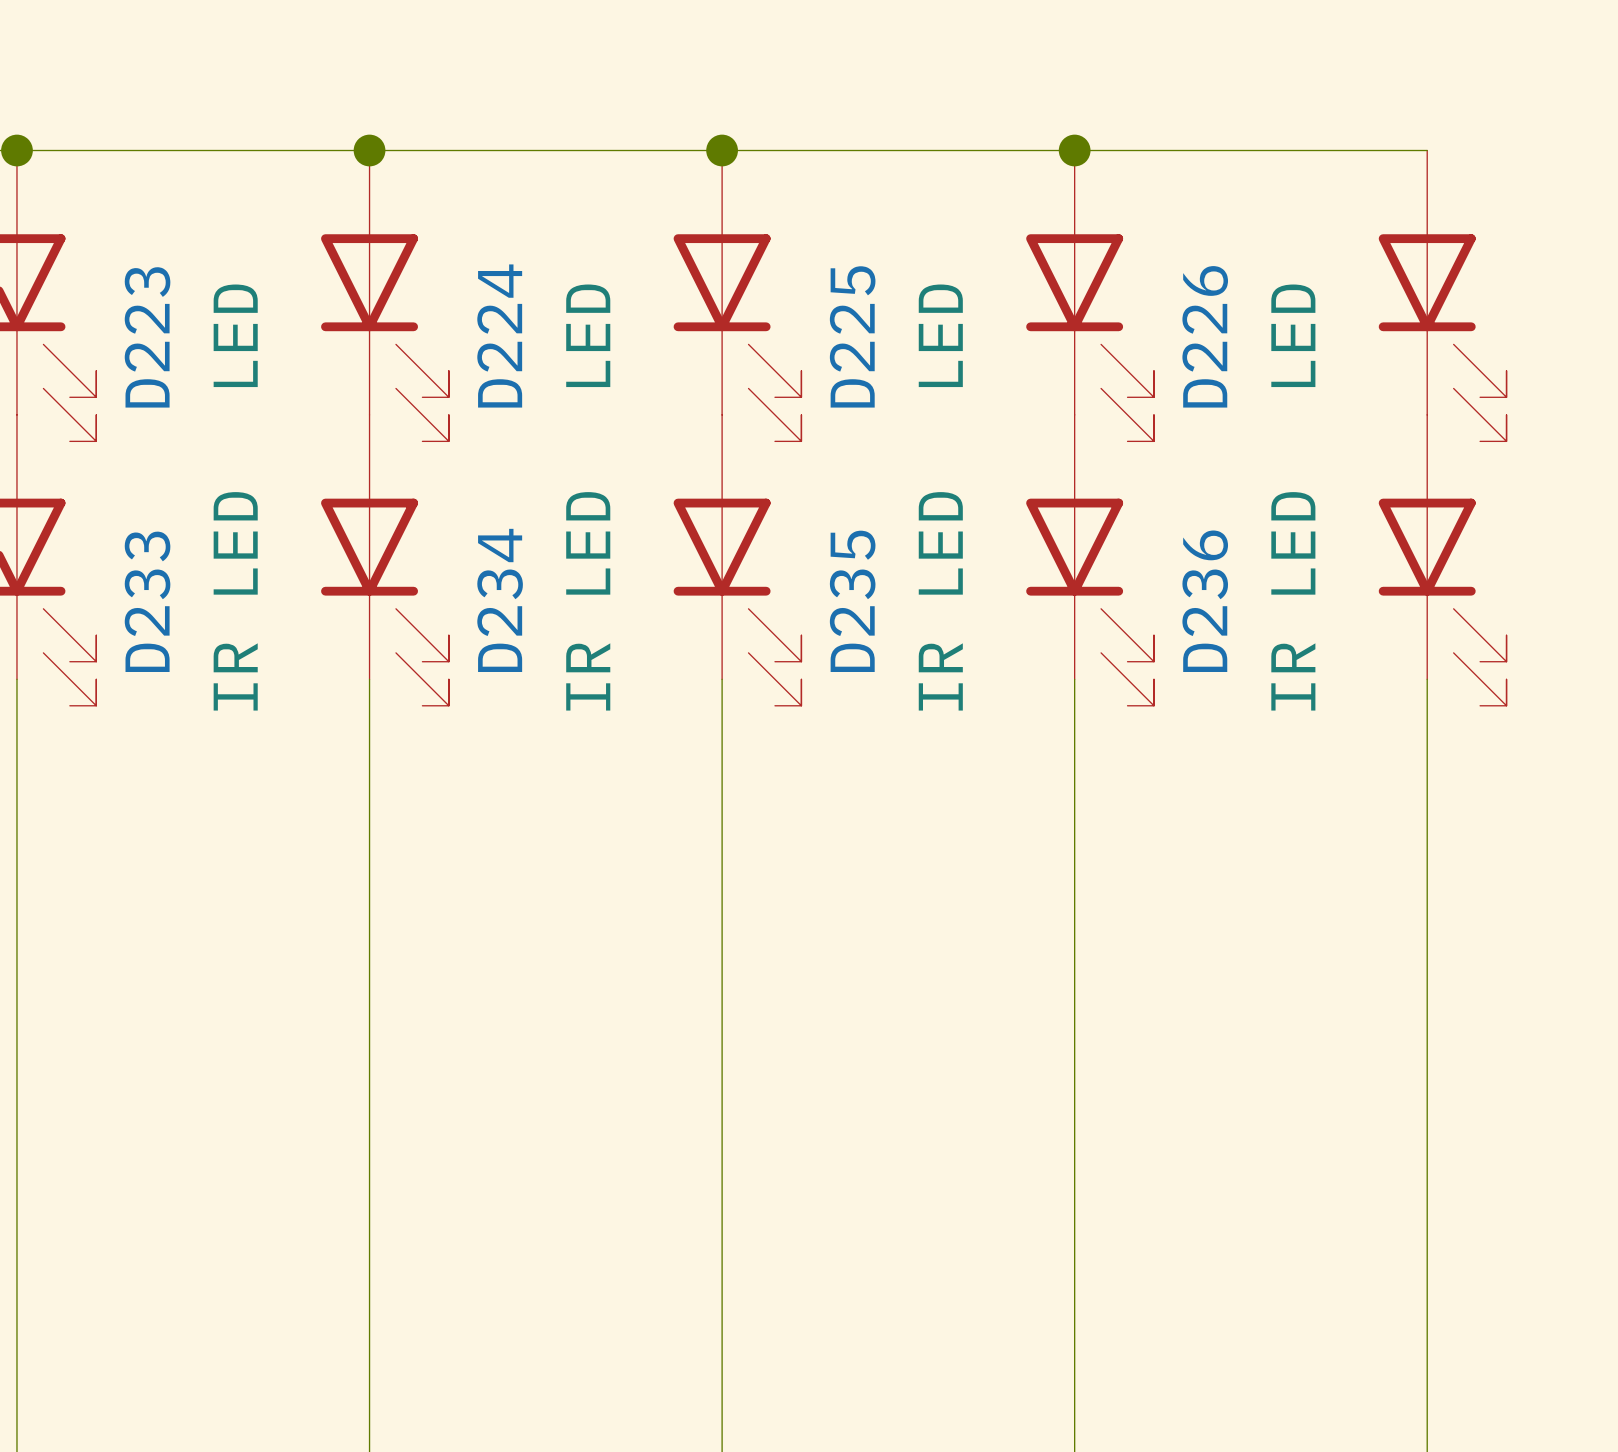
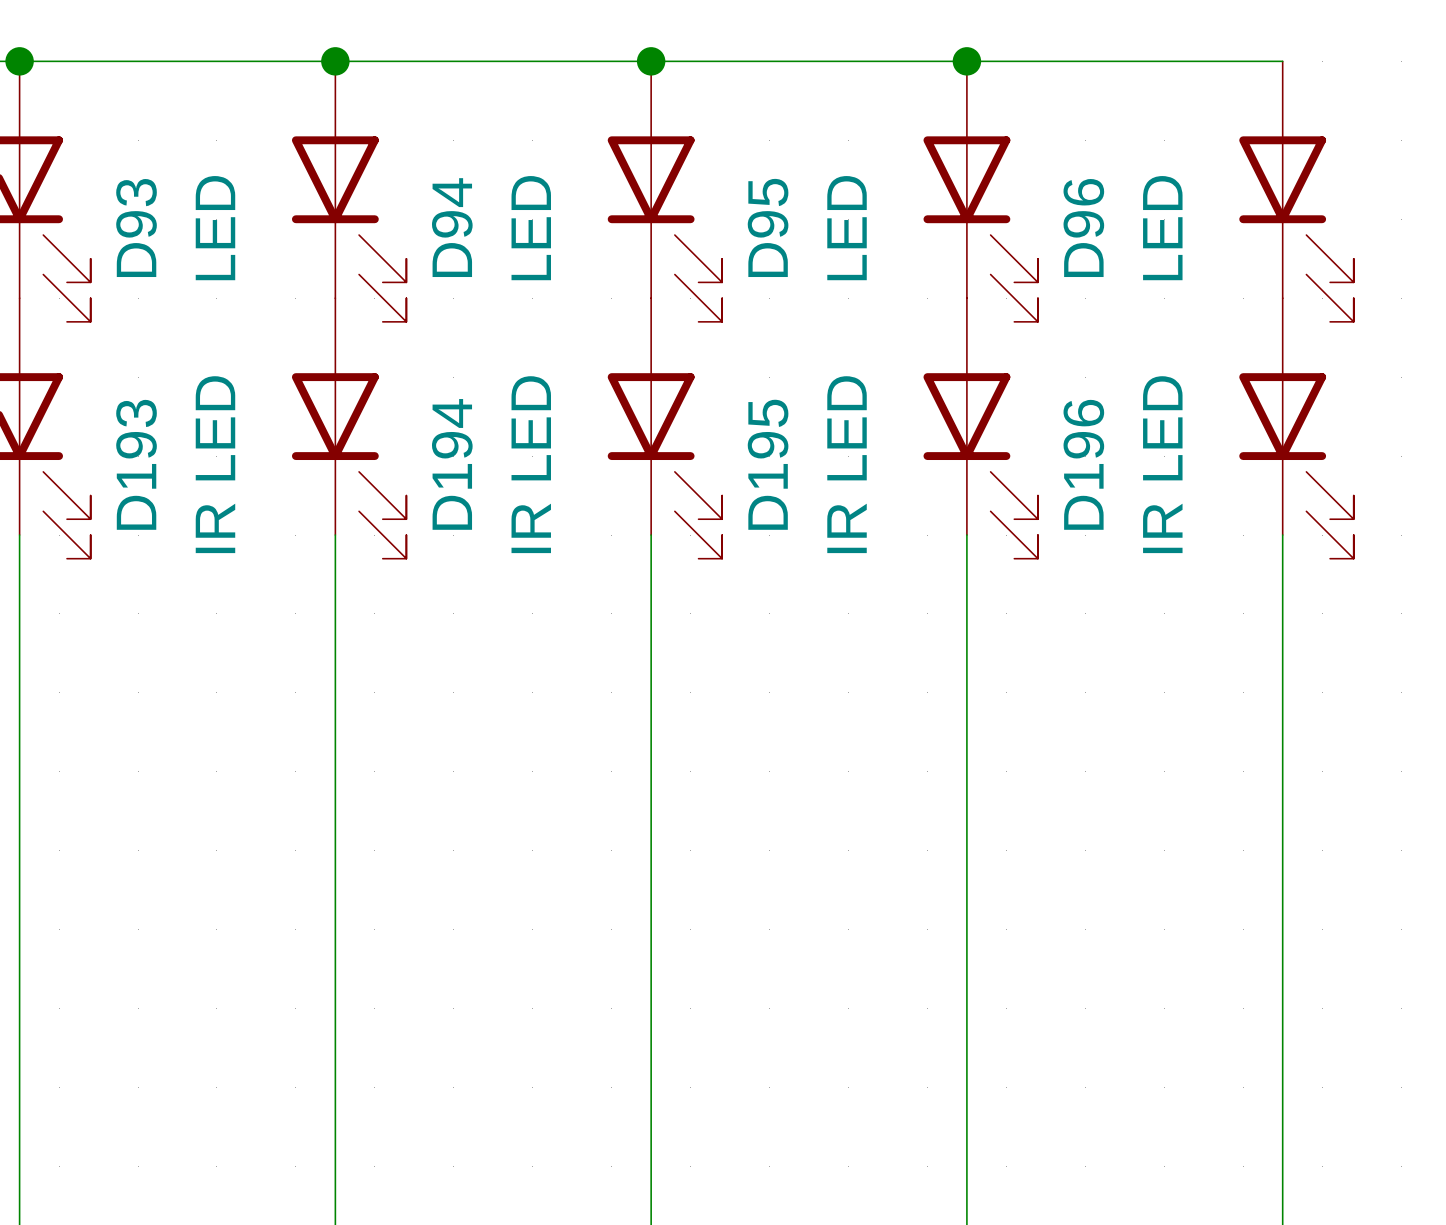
D224 name: D224 (499, 336) -> D94 (452, 227)
D225 name: D225 (852, 336) -> D95 (768, 227)
D226 name: D226 (1205, 336) -> D96 (1083, 228)
D223 name: D223 (147, 337) -> D93 (136, 228)
D234 name: D234 (500, 600) -> D194 (452, 464)
D233 name: D233 (147, 601) -> D193 (136, 464)
D235 name: D235 (852, 601) -> D195 (768, 464)
D236 name: D236 (1205, 601) -> D196 (1083, 464)

